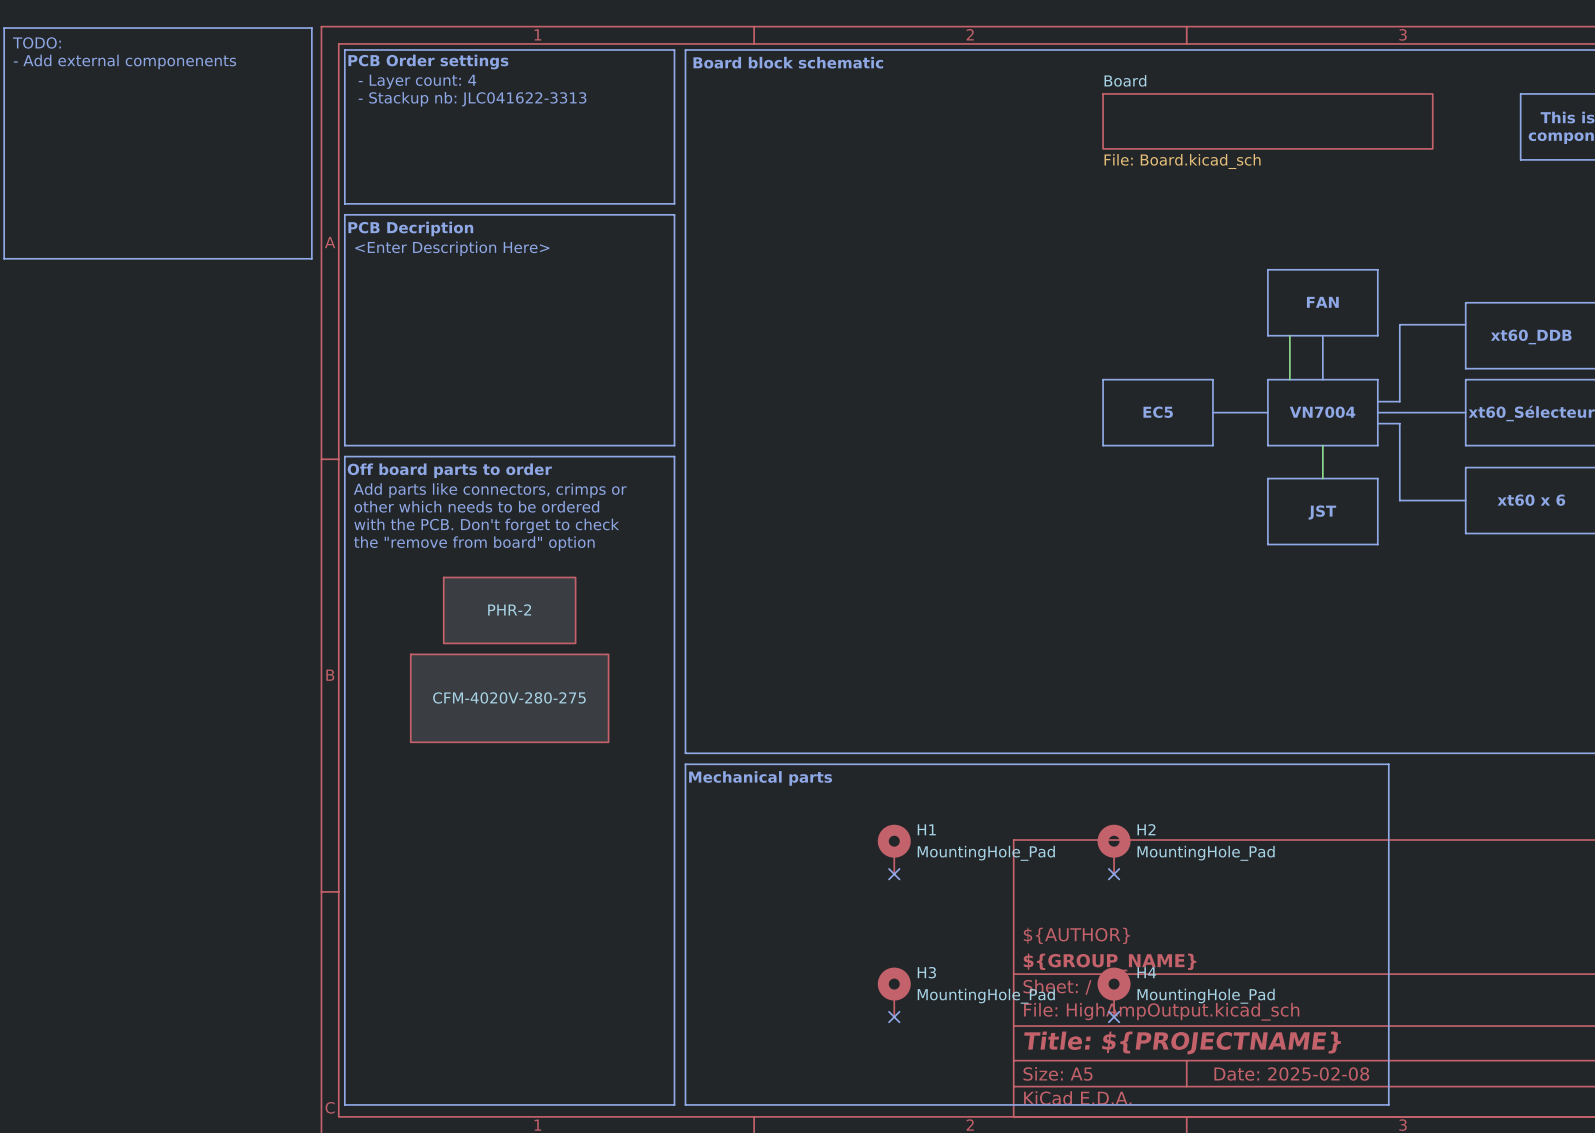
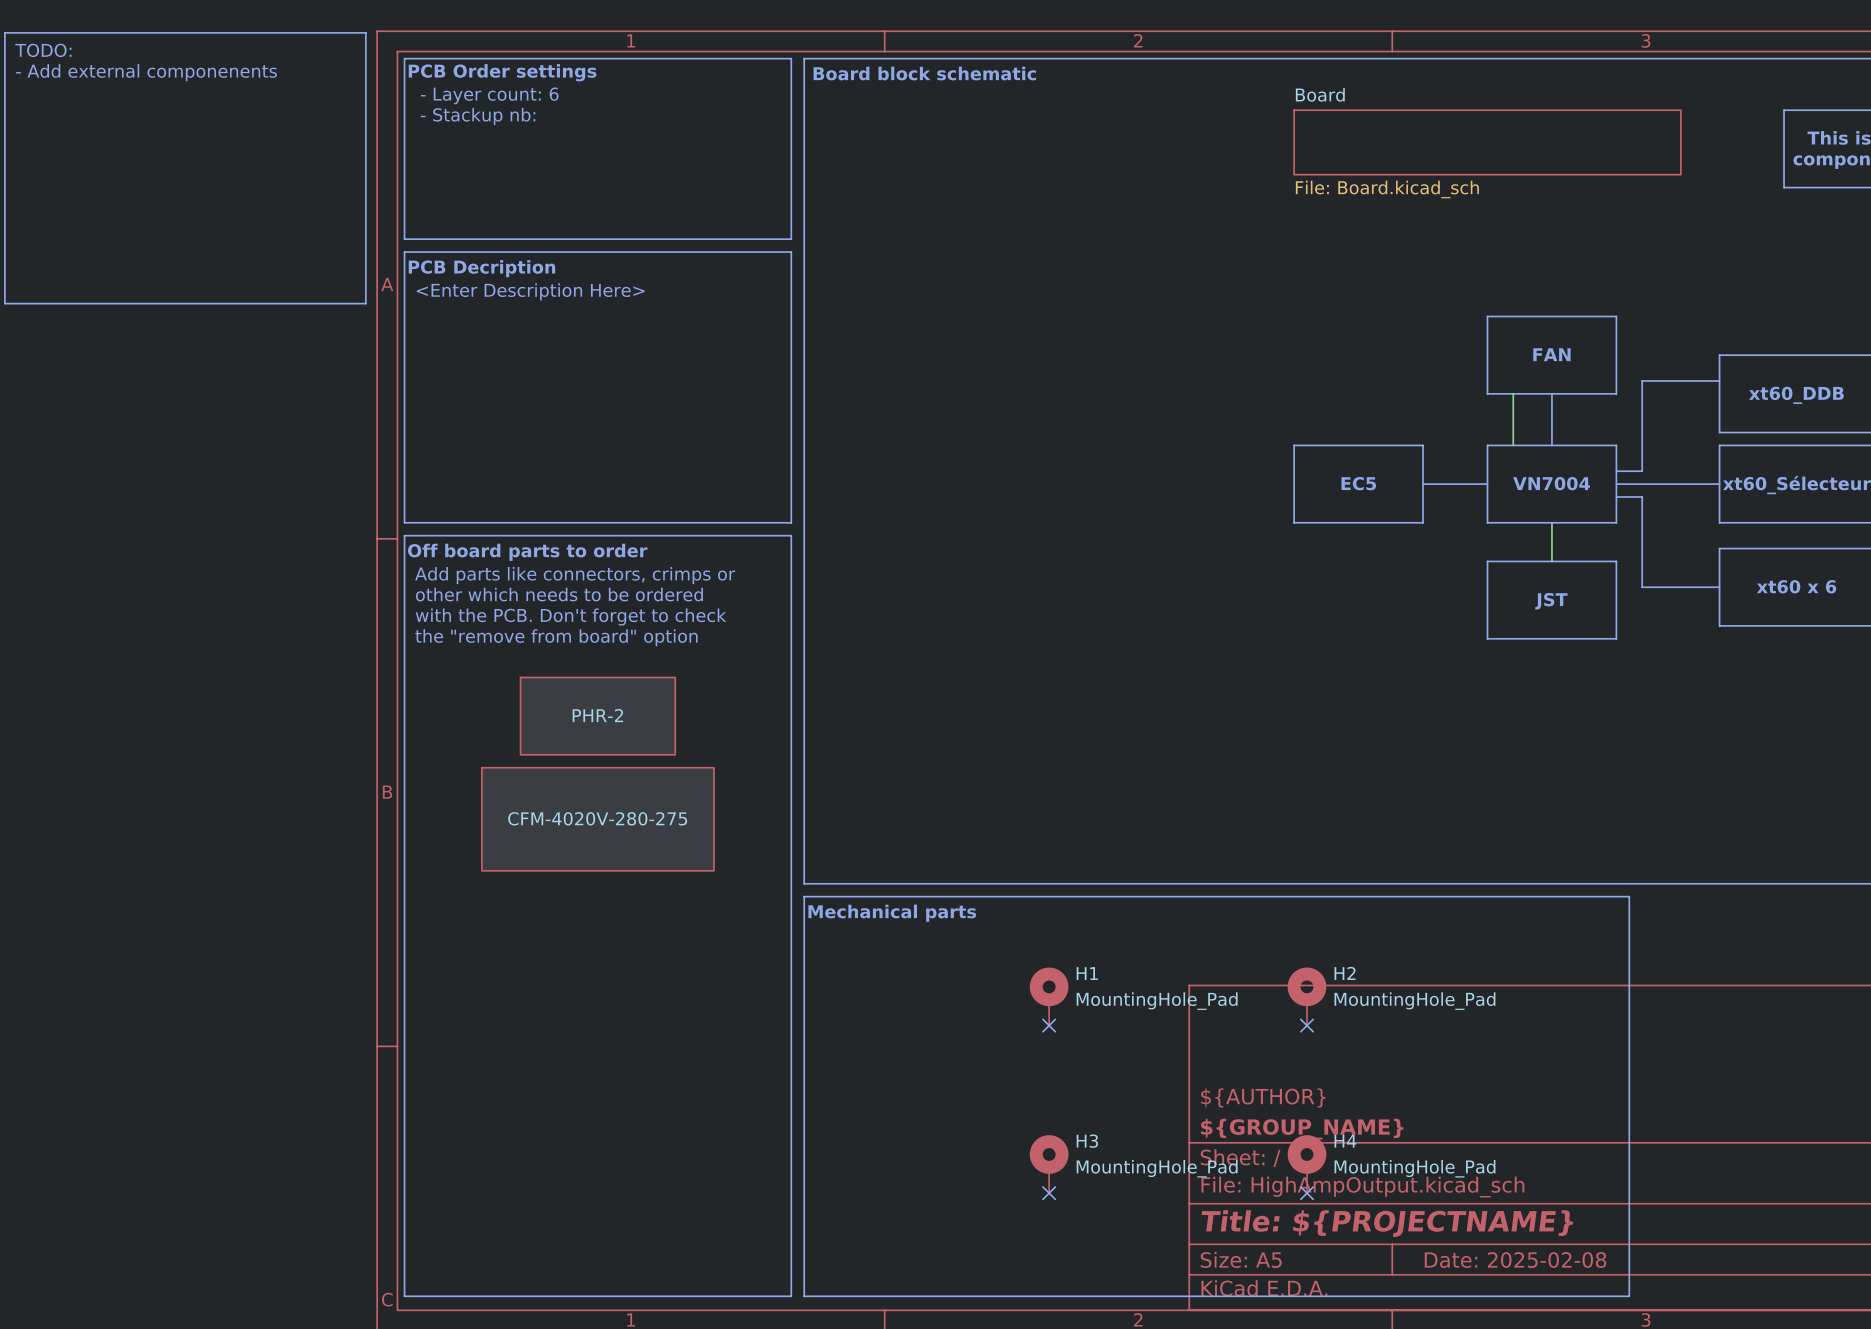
text: - Layer count: 4 (417, 81) -> - Layer count: 6 (489, 95)
text: - Stackup nb: JLC041622-3313 (472, 99) -> - Stackup nb: (478, 116)

